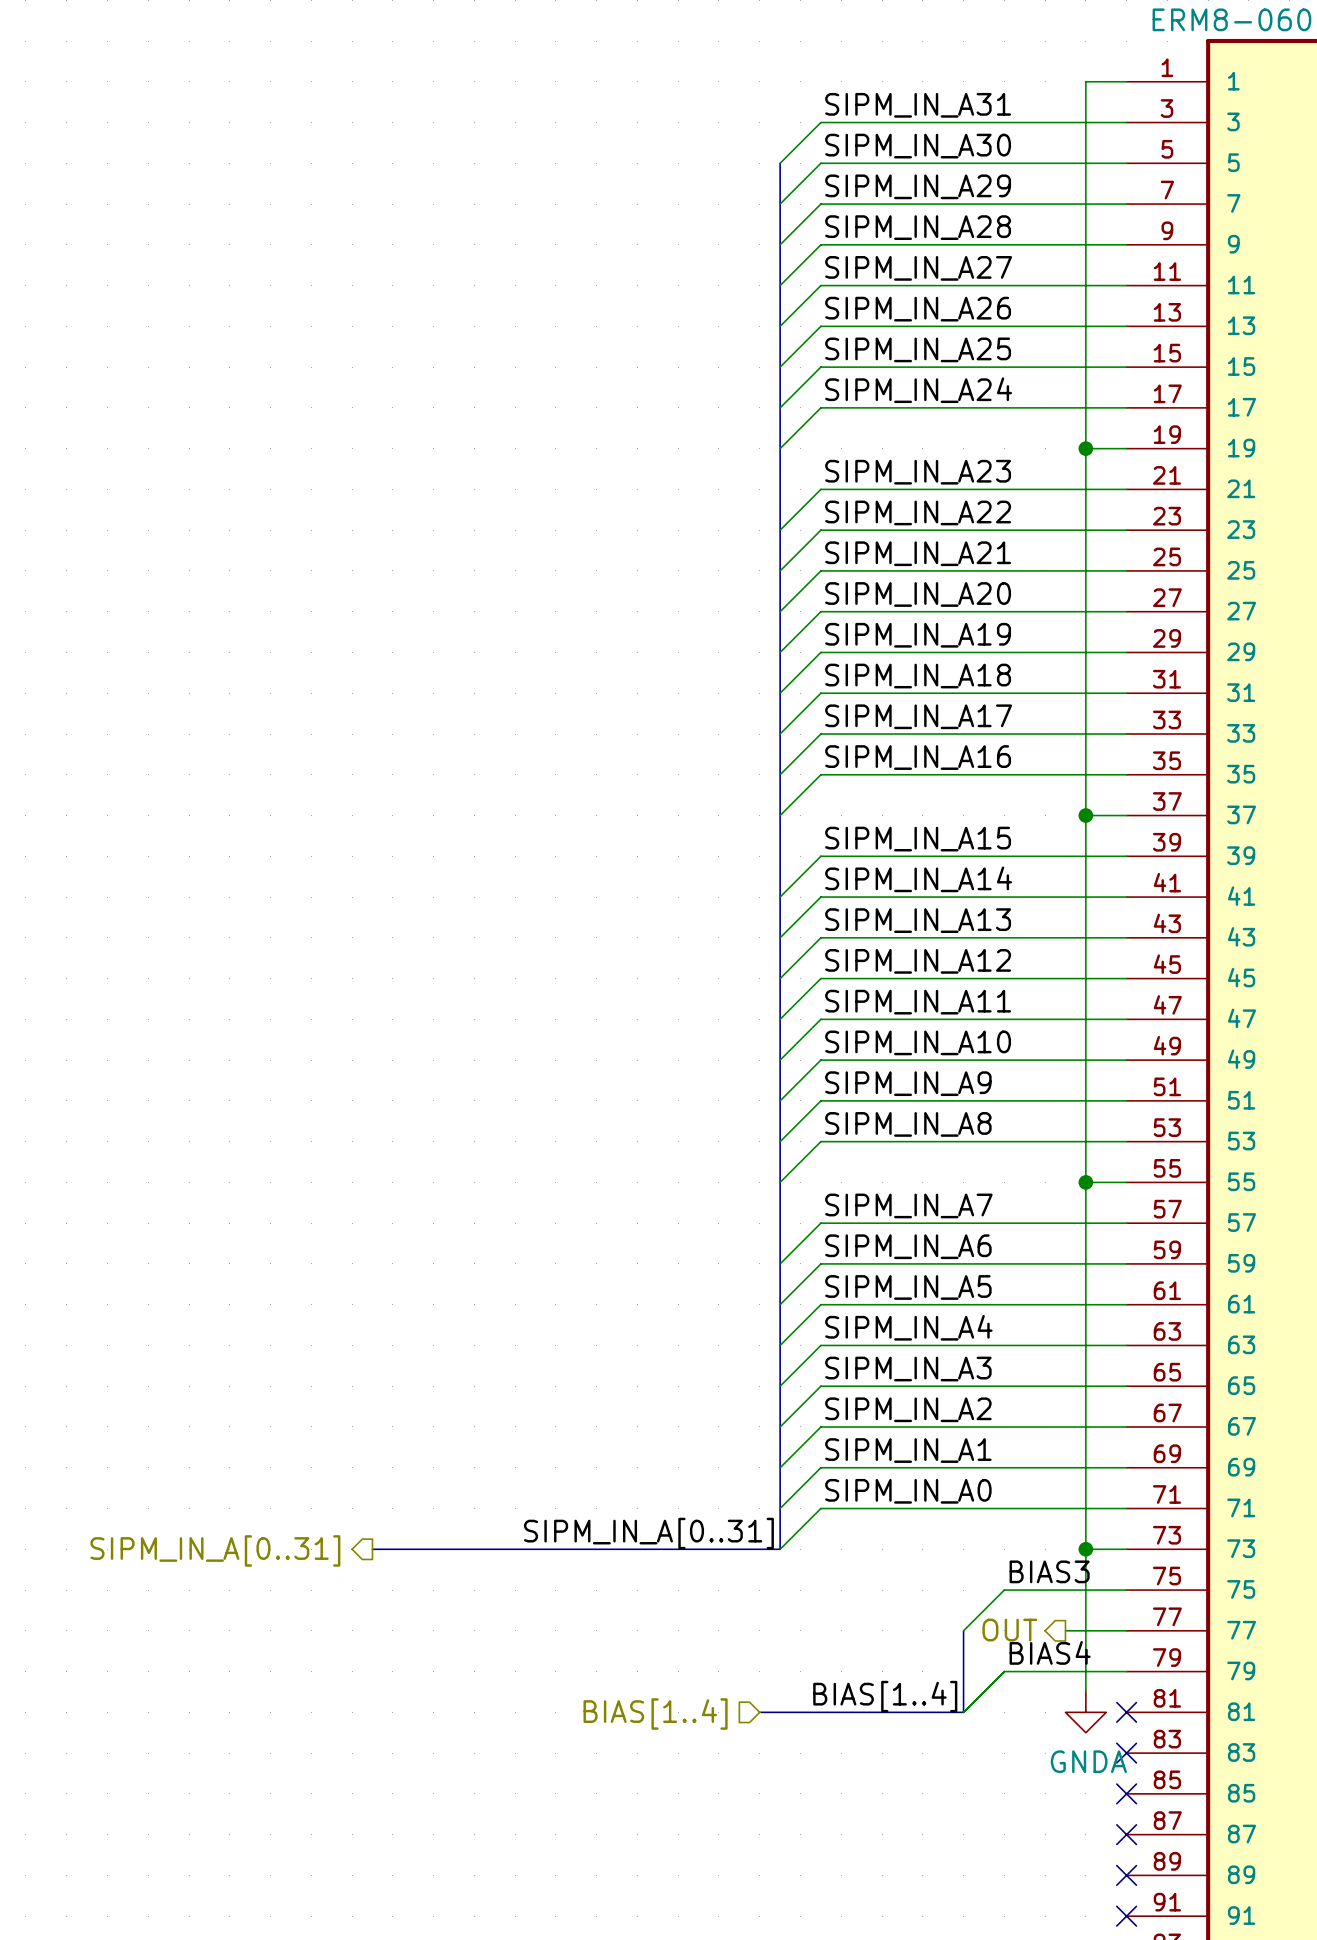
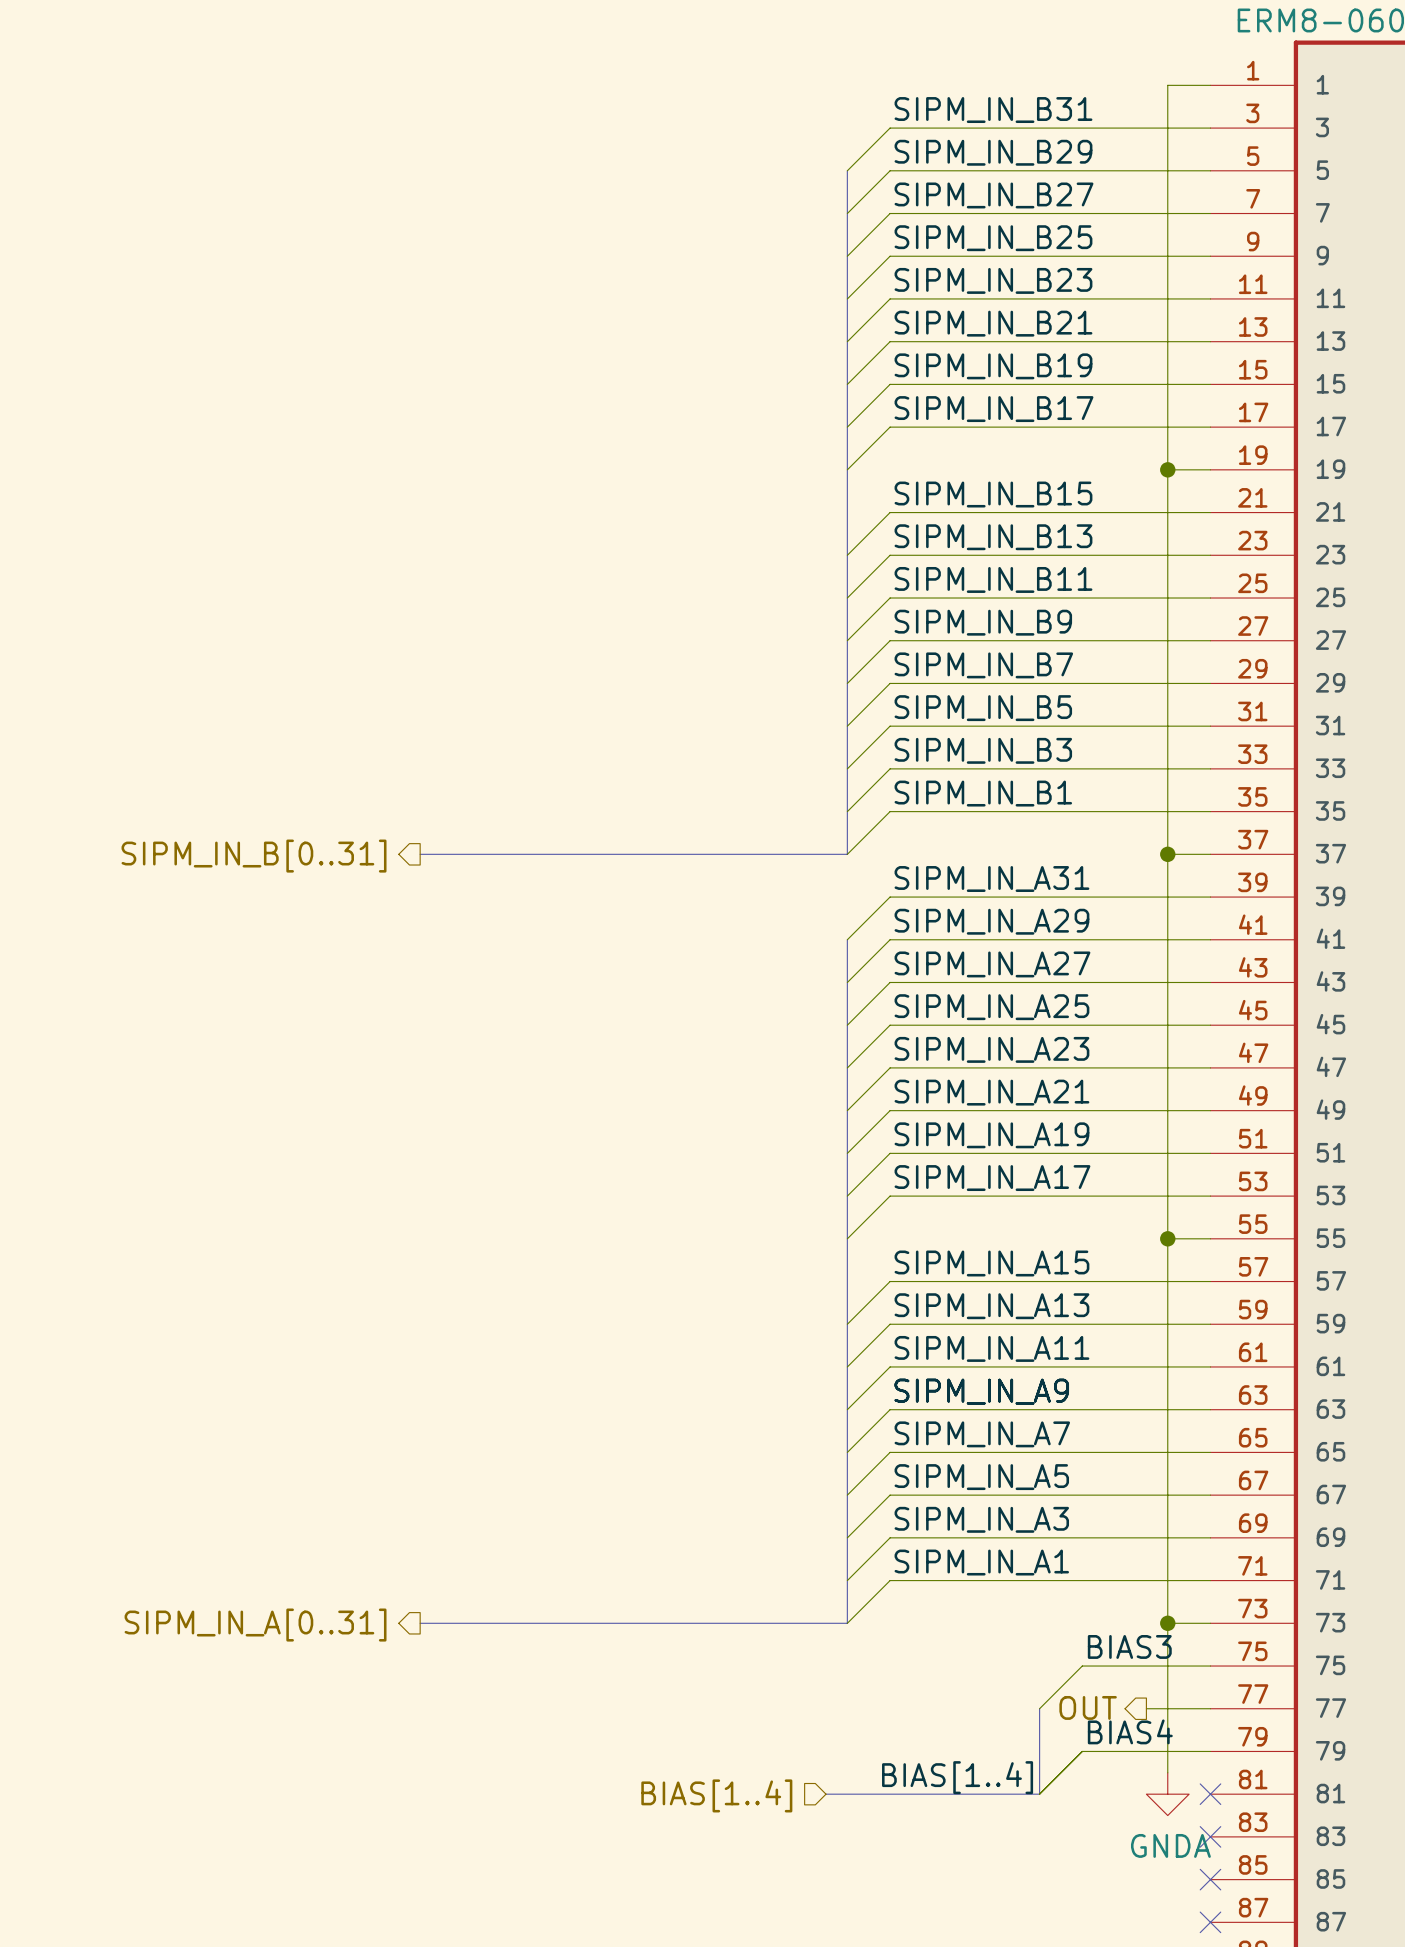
label: SIPM_IN_A31 (918, 105) -> SIPM_IN_B31 (993, 110)
label: SIPM_IN_A30 (918, 146) -> SIPM_IN_B29 (993, 152)
label: SIPM_IN_A29 (918, 186) -> SIPM_IN_B27 (993, 195)
label: SIPM_IN_A28 (918, 227) -> SIPM_IN_B25 (993, 238)
label: SIPM_IN_A27 (918, 268) -> SIPM_IN_B23 (993, 280)
label: SIPM_IN_A26 (918, 309) -> SIPM_IN_B21 (993, 323)
label: SIPM_IN_A25 (918, 349) -> SIPM_IN_B19 (993, 366)
label: SIPM_IN_A24 (918, 390) -> SIPM_IN_B17 (993, 409)
label: SIPM_IN_A23 (918, 472) -> SIPM_IN_B15 (993, 494)
label: SIPM_IN_A22 (918, 512) -> SIPM_IN_B13 (993, 537)
label: SIPM_IN_A21 (918, 553) -> SIPM_IN_B11 (993, 579)
label: SIPM_IN_A20 (918, 594) -> SIPM_IN_B9 (983, 622)
label: SIPM_IN_A19 (918, 635) -> SIPM_IN_B7 (983, 665)
label: SIPM_IN_A18 (918, 676) -> SIPM_IN_B5 (983, 708)
label: SIPM_IN_A17 (918, 716) -> SIPM_IN_B3 (983, 750)
label: SIPM_IN_A16 (918, 757) -> SIPM_IN_B1 (983, 793)
bus: (780, 815) (780, 897) -> (847, 854) (420, 854)
hierarchical label: none -> SIPM_IN_B[0..31] (254, 856)
label: SIPM_IN_A15 (918, 839) -> SIPM_IN_A31 (991, 879)
label: SIPM_IN_A14 (918, 879) -> SIPM_IN_A29 (991, 921)
label: SIPM_IN_A13 (918, 920) -> SIPM_IN_A27 (992, 964)
label: SIPM_IN_A12 (918, 961) -> SIPM_IN_A25 (991, 1007)
label: SIPM_IN_A11 (918, 1002) -> SIPM_IN_A23 (991, 1049)
label: SIPM_IN_A10 (918, 1042) -> SIPM_IN_A21 (991, 1092)
label: SIPM_IN_A9 (908, 1083) -> SIPM_IN_A19 (991, 1135)
label: SIPM_IN_A8 (908, 1124) -> SIPM_IN_A17 (992, 1178)
label: SIPM_IN_A7 (908, 1205) -> SIPM_IN_A15 (991, 1263)
label: SIPM_IN_A6 (908, 1246) -> SIPM_IN_A13 (991, 1306)
label: SIPM_IN_A5 (908, 1287) -> SIPM_IN_A11 (991, 1348)
label: SIPM_IN_A4 (908, 1327) -> SIPM_IN_A9 (981, 1391)
label: SIPM_IN_A3 (908, 1369) -> SIPM_IN_A7 (982, 1434)
label: SIPM_IN_A2 (908, 1409) -> SIPM_IN_A5 (981, 1477)
label: SIPM_IN_A1 (908, 1450) -> SIPM_IN_A3 (981, 1519)
label: SIPM_IN_A0 (908, 1491) -> SIPM_IN_A1 (981, 1562)
label: SIPM_IN_A[0..31] (648, 1533) -> none

